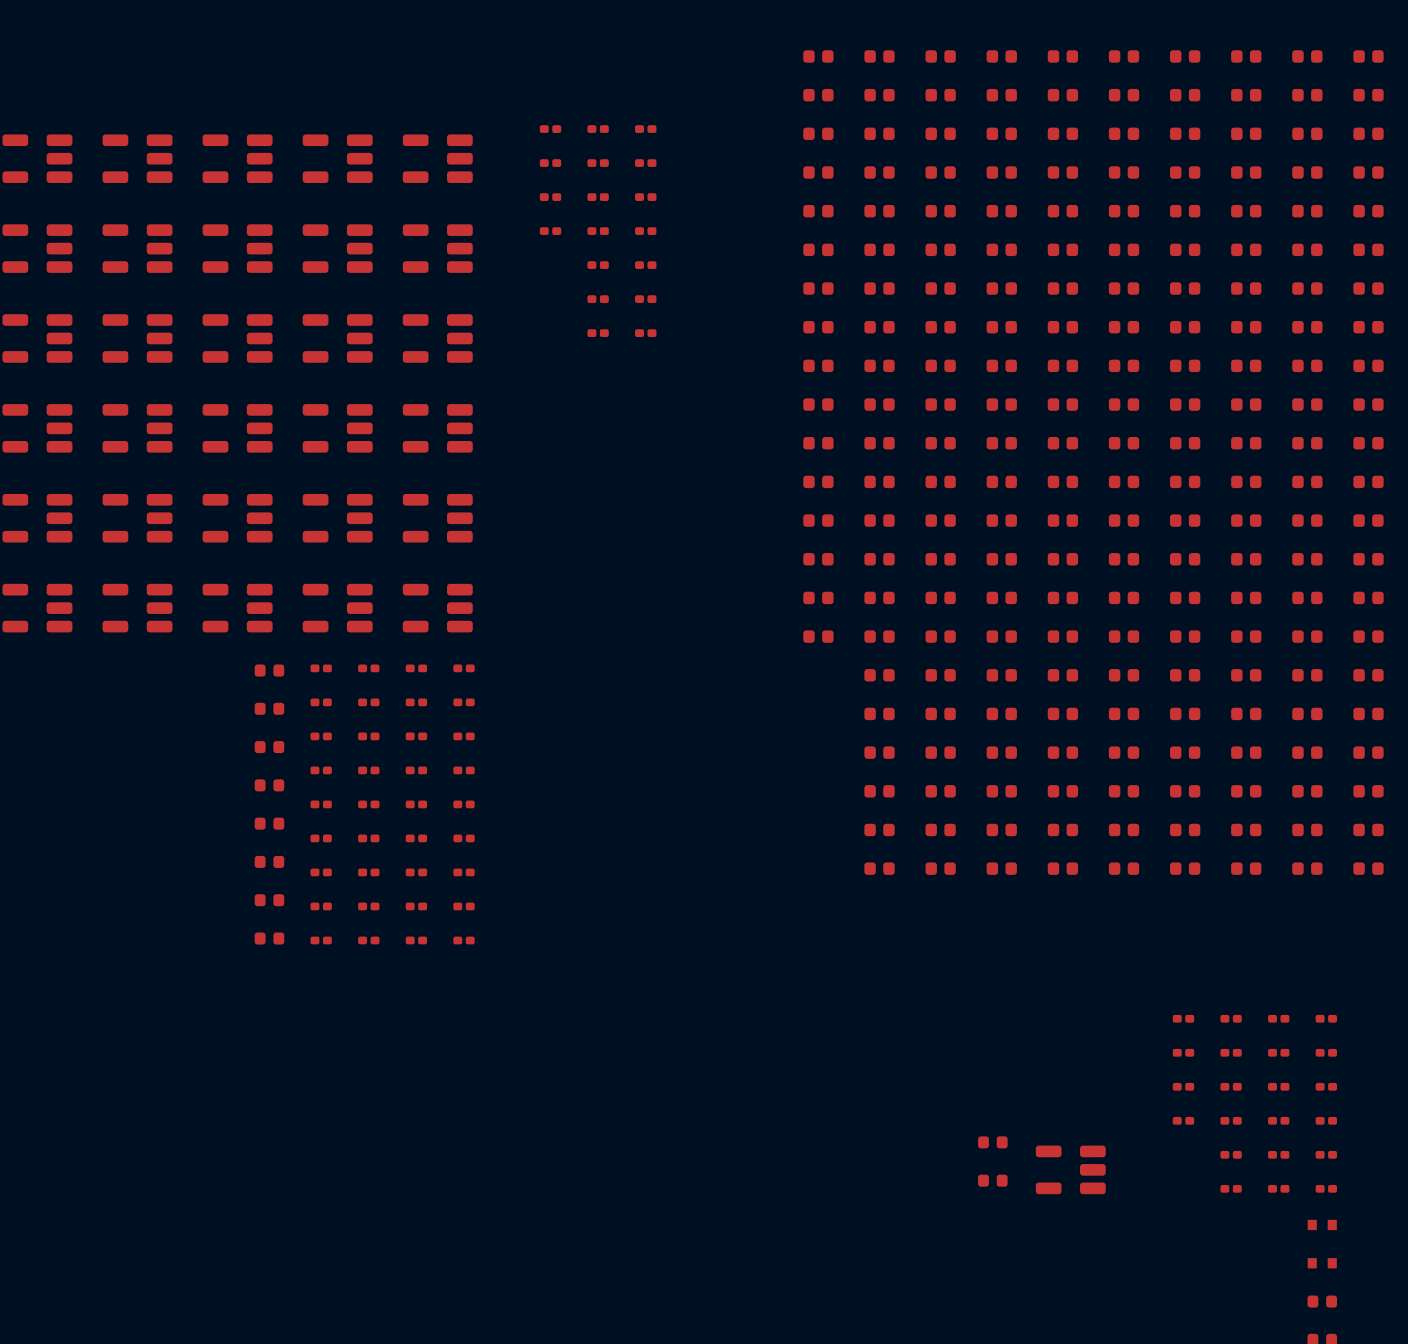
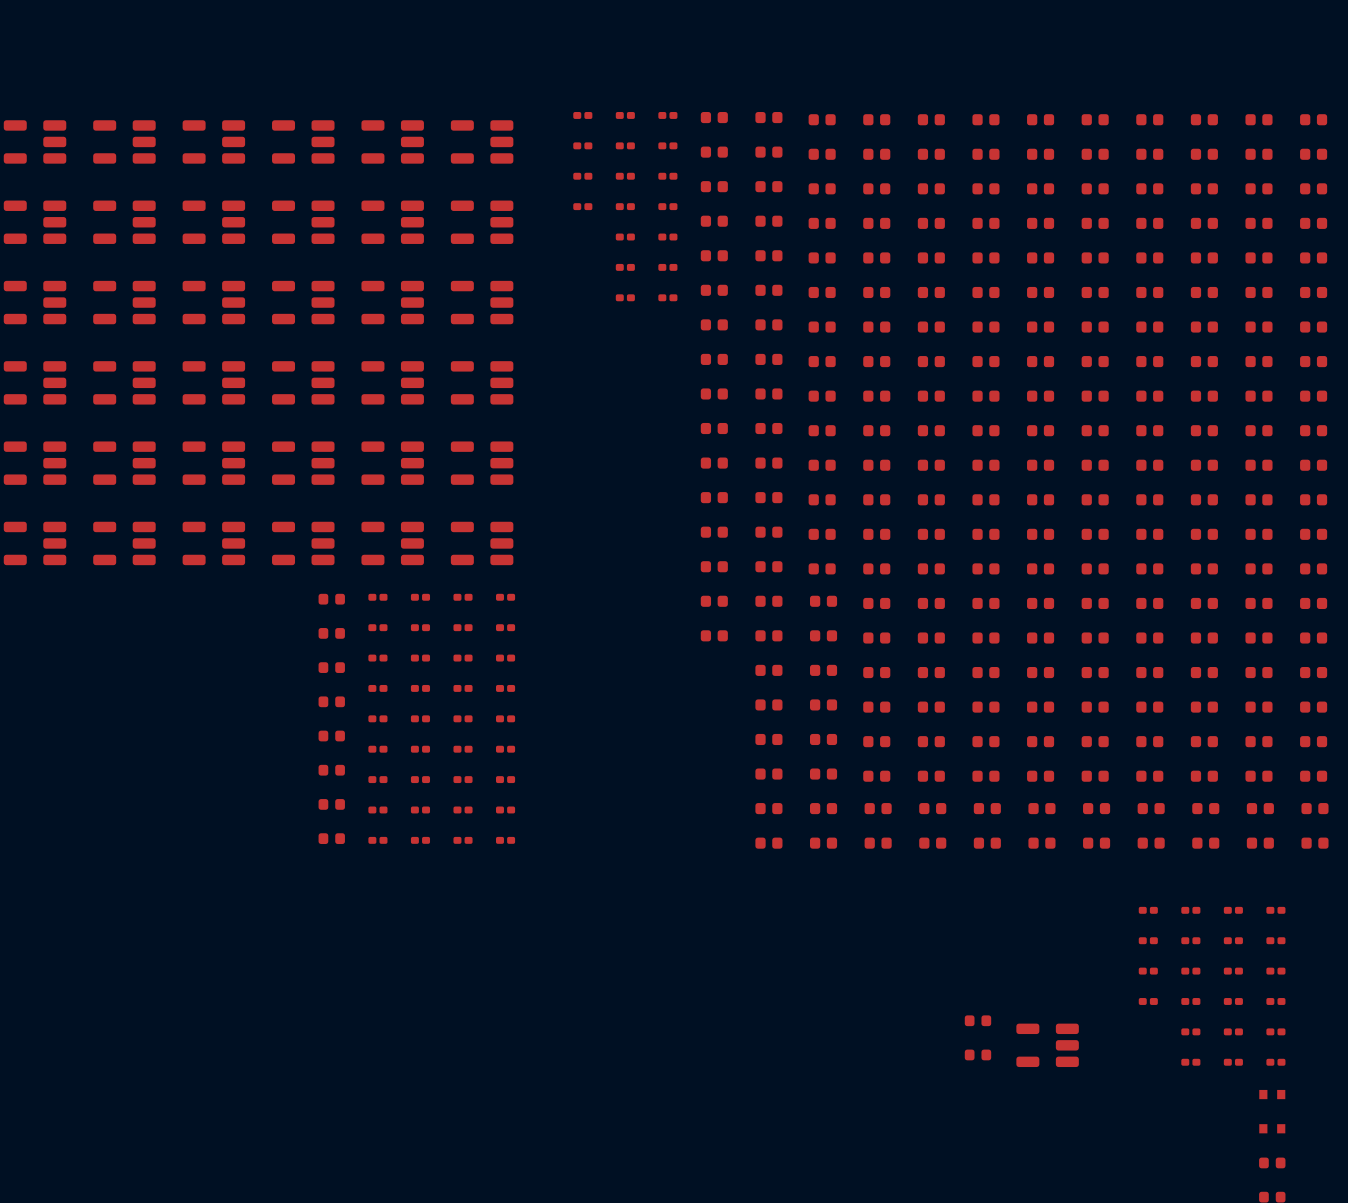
part: (818, 56) -> none
part: (879, 56) -> none
part: (940, 56) -> none
part: (1001, 56) -> none
part: (1062, 56) -> none
part: (1124, 56) -> none
part: (1185, 56) -> none
part: (1246, 56) -> none
part: (1307, 56) -> none
part: (1368, 56) -> none
part: (818, 95) -> none
part: (879, 95) -> none
part: (940, 95) -> none
part: (1001, 95) -> none
part: (1062, 95) -> none
part: (1124, 95) -> none
part: (1185, 95) -> none
part: (1246, 95) -> none
part: (1307, 95) -> none
part: (1368, 95) -> none
part: none -> (714, 117)
part: none -> (768, 117)
part: none -> (714, 152)
part: none -> (768, 152)
part: none -> (714, 186)
part: none -> (768, 186)
part: none -> (714, 221)
part: none -> (768, 221)
part: none -> (714, 255)
part: none -> (768, 255)
part: none -> (714, 290)
part: none -> (768, 290)
part: none -> (714, 324)
part: none -> (768, 324)
part: none -> (714, 359)
part: none -> (768, 359)
part: none -> (714, 393)
part: none -> (768, 393)
part: none -> (714, 428)
part: none -> (768, 428)
part: none -> (714, 463)
part: none -> (768, 463)
part: none -> (714, 497)
part: none -> (768, 497)
part: none -> (714, 532)
part: none -> (768, 532)
part: none -> (714, 566)
part: none -> (768, 566)
part: none -> (714, 601)
part: none -> (768, 601)
part: none -> (823, 601)
part: none -> (714, 635)
part: none -> (768, 635)
part: none -> (823, 635)
part: none -> (768, 670)
part: none -> (823, 670)
part: none -> (768, 704)
part: none -> (823, 704)
part: none -> (768, 739)
part: none -> (823, 739)
part: none -> (768, 774)
part: none -> (823, 774)
part: none -> (768, 808)
part: none -> (823, 808)
part: none -> (878, 808)
part: none -> (932, 808)
part: none -> (987, 808)
part: none -> (1041, 808)
part: none -> (1096, 808)
part: none -> (1151, 808)
part: none -> (1205, 808)
part: none -> (1260, 808)
part: none -> (1314, 808)
part: none -> (768, 843)
part: none -> (823, 843)
part: none -> (878, 843)
part: none -> (932, 843)
part: none -> (987, 843)
part: none -> (1041, 843)
part: none -> (1096, 843)
part: none -> (1151, 843)
part: none -> (1205, 843)
part: none -> (1260, 843)
part: none -> (1314, 843)

